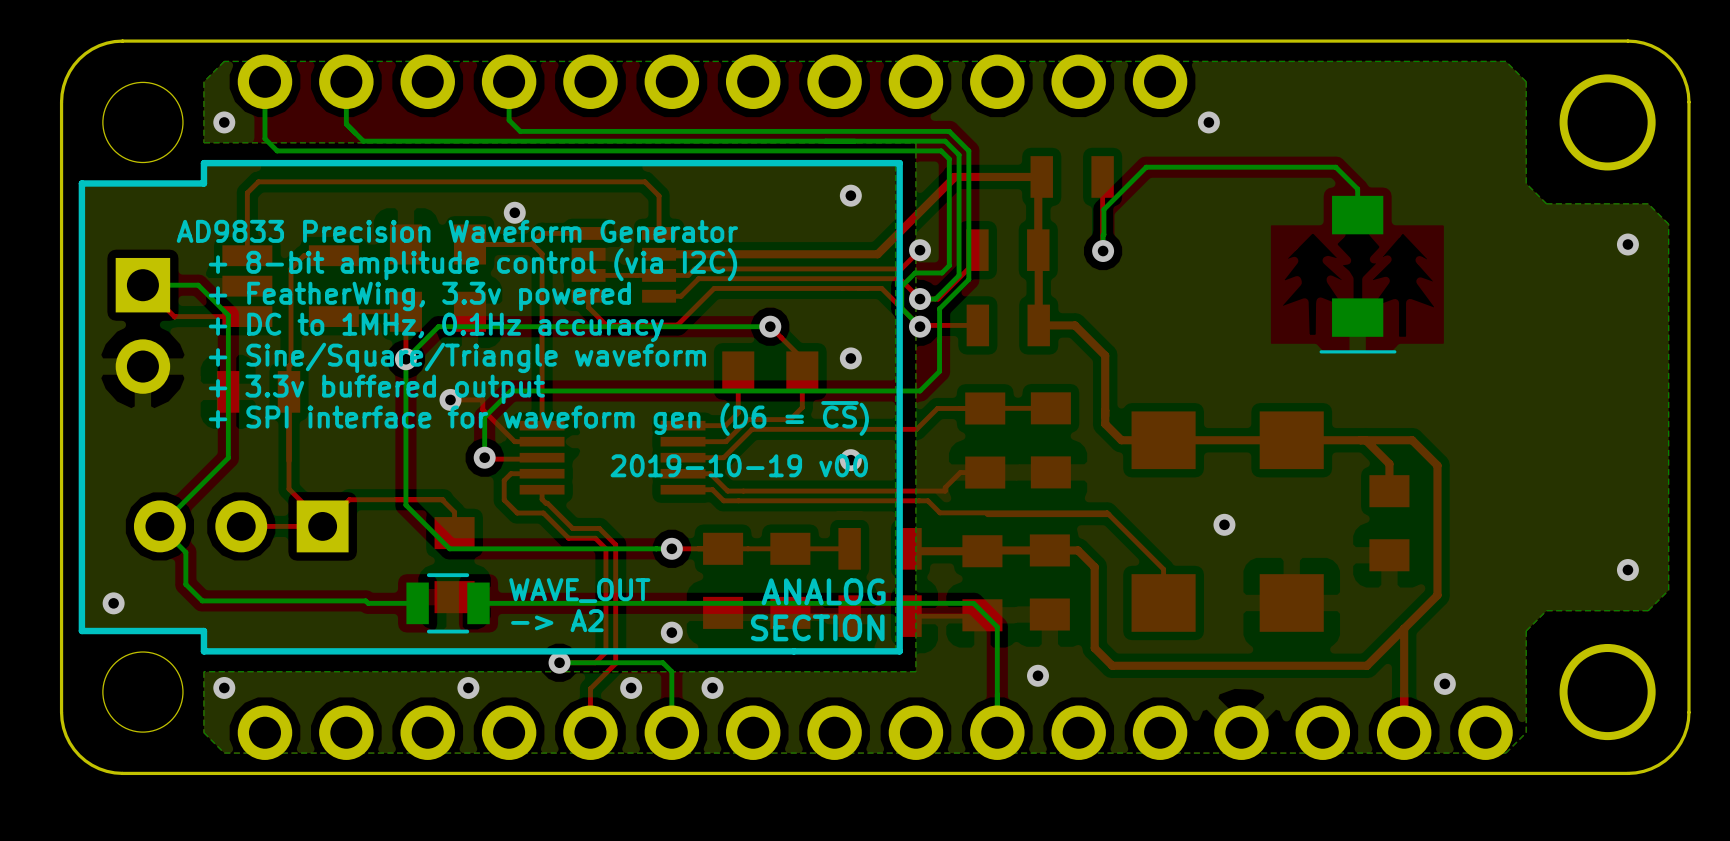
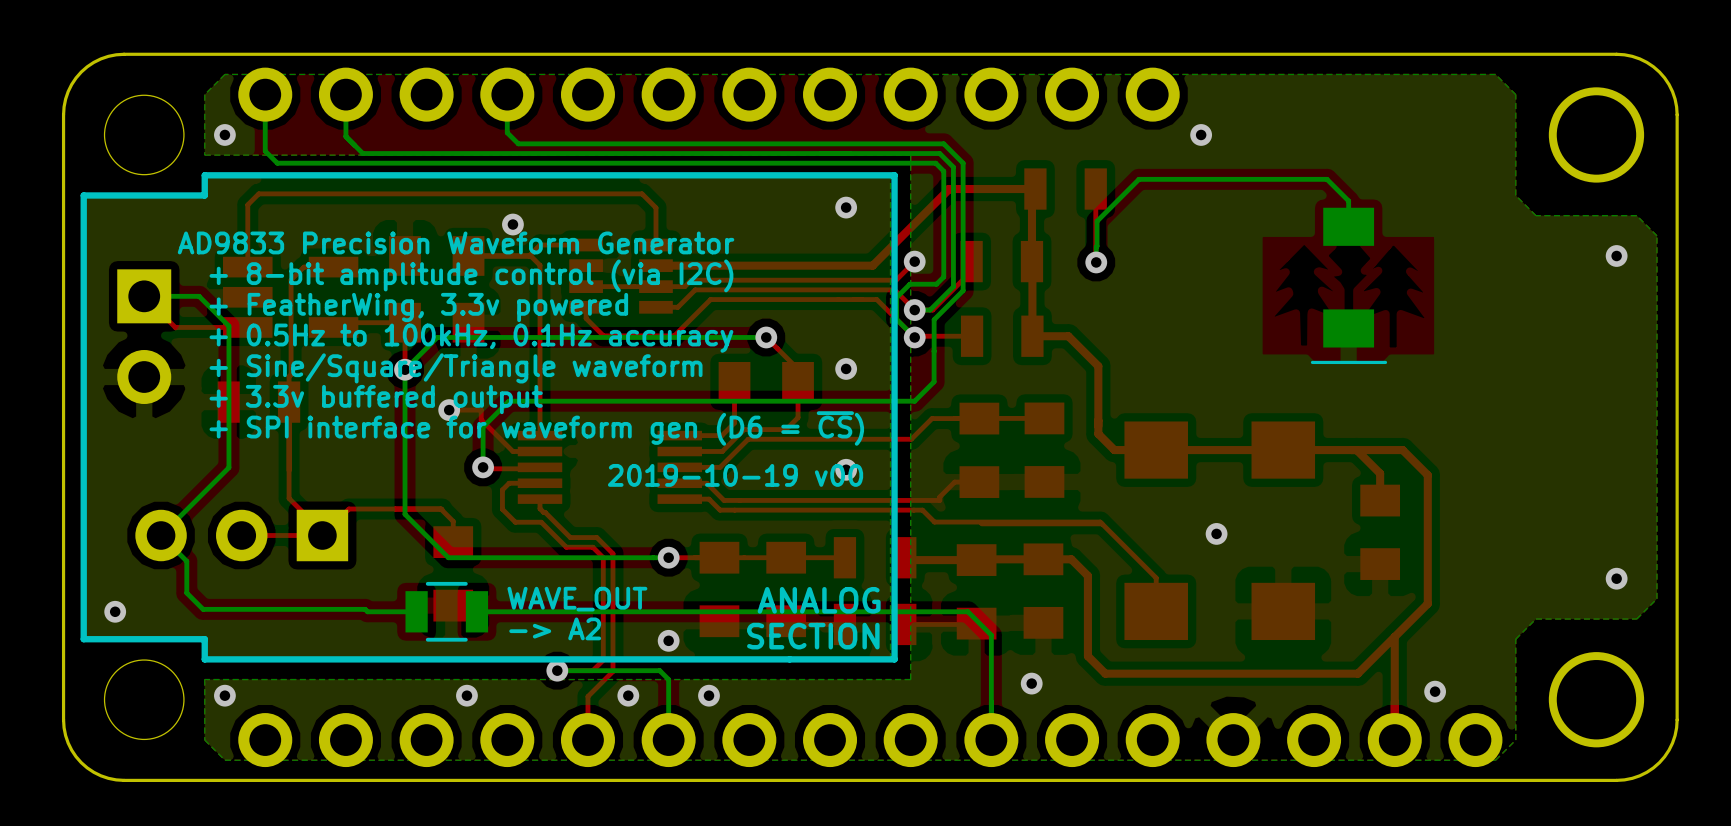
text: + DC to 1MHz, 0.1Hz accuracy (436, 327) -> + 0.5Hz to 100kHz, 0.1Hz accuracy (471, 338)

